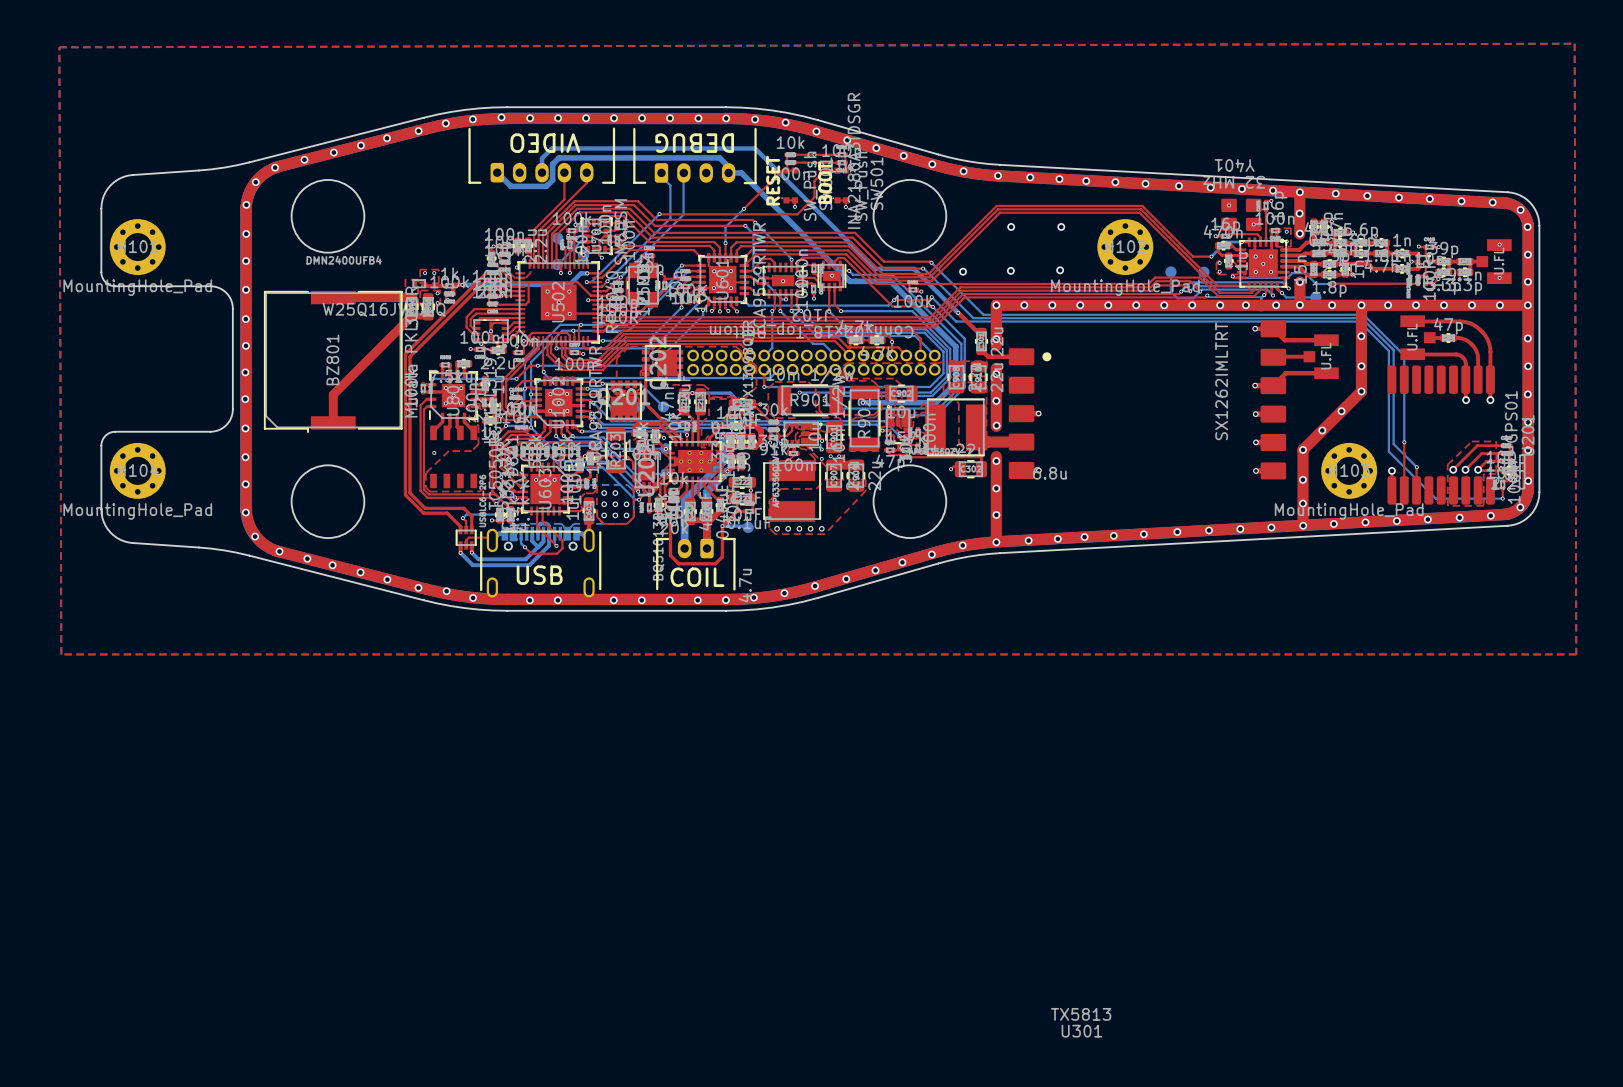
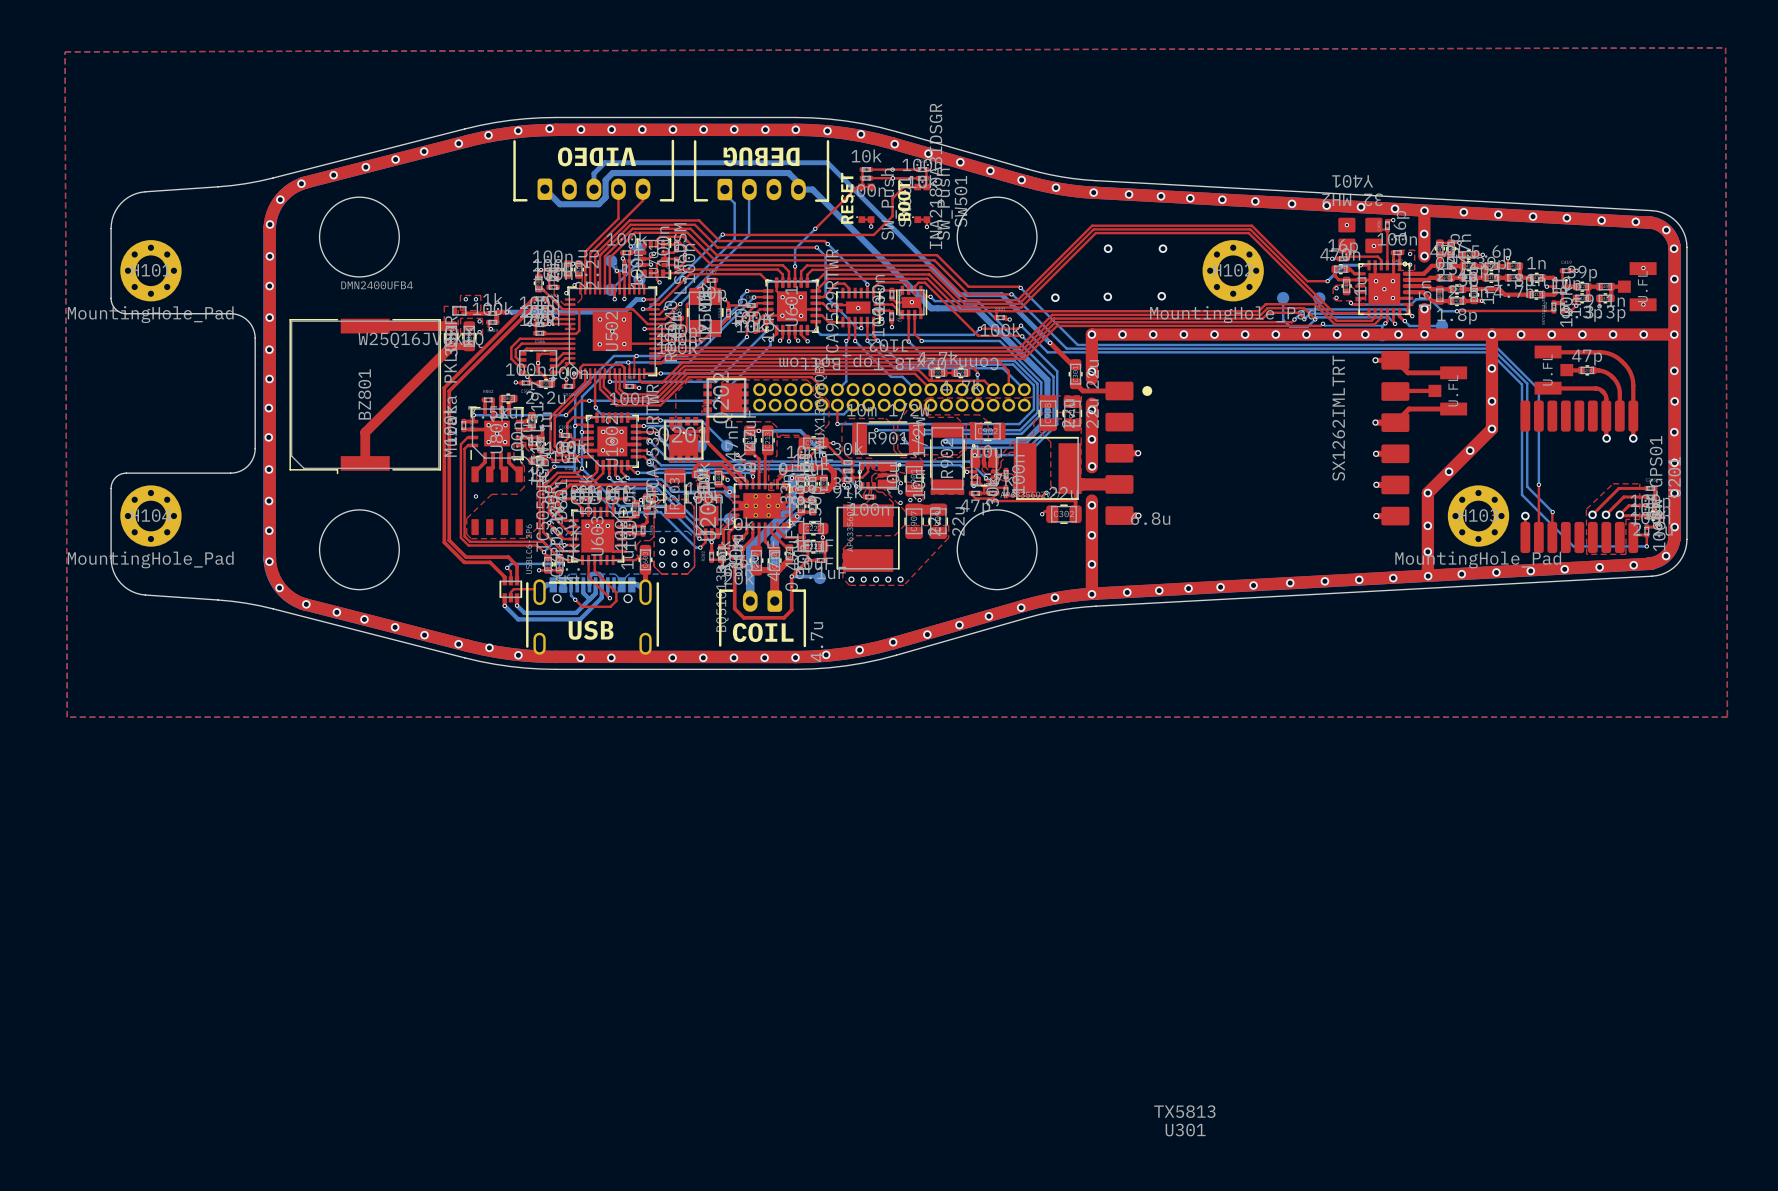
top track: (1418, 246) (1425, 247) -> none
via: (1418, 246) -> none

